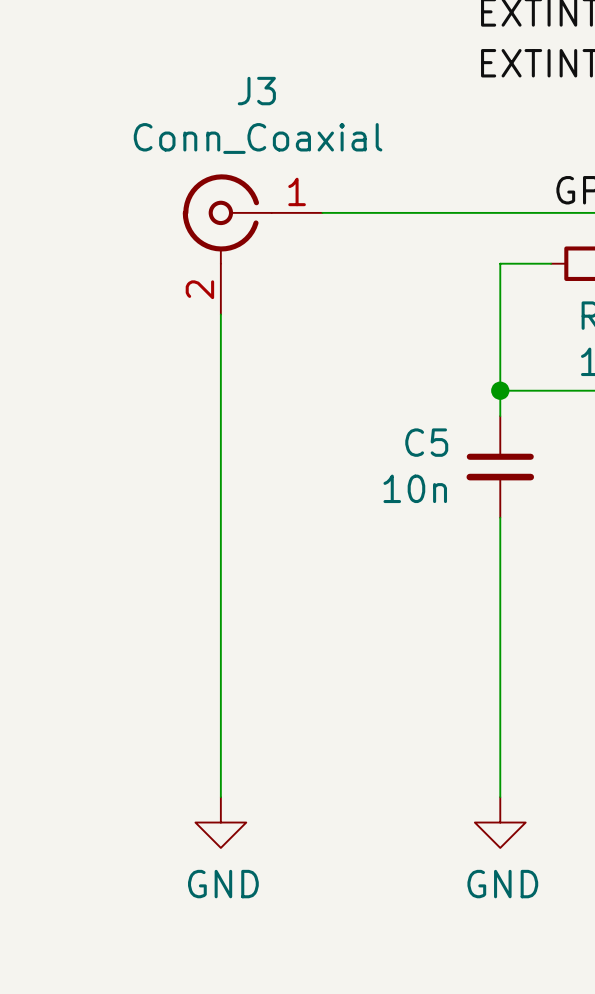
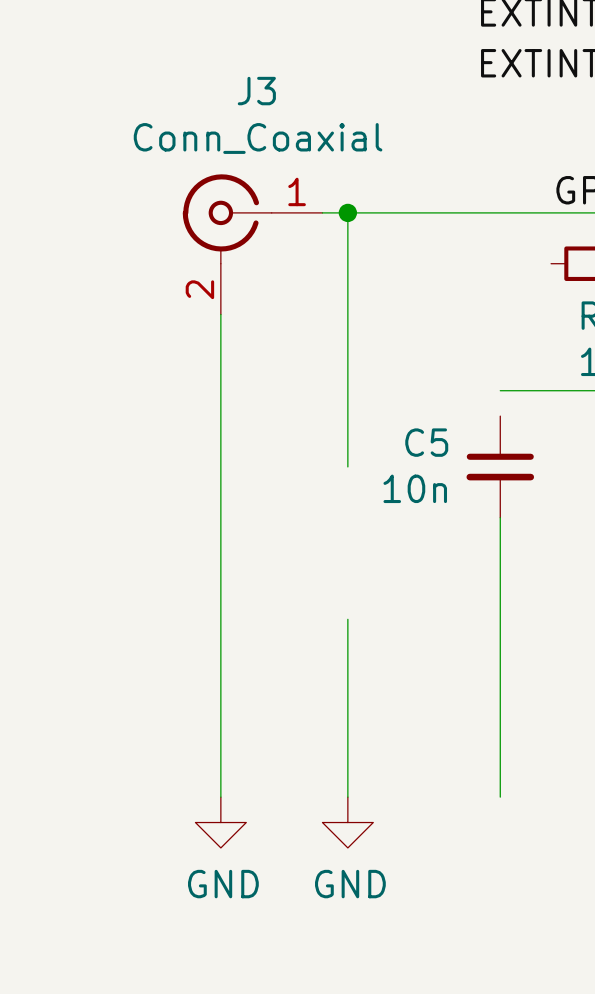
wire: none -> (347, 212) (347, 466)
junction: none -> (347, 212)
wire: (551, 263) (500, 263) (500, 416) -> none
junction: (500, 390) -> none
wire: none -> (347, 619) (347, 797)
power symbol position: GND (500, 822) -> GND (347, 822)

